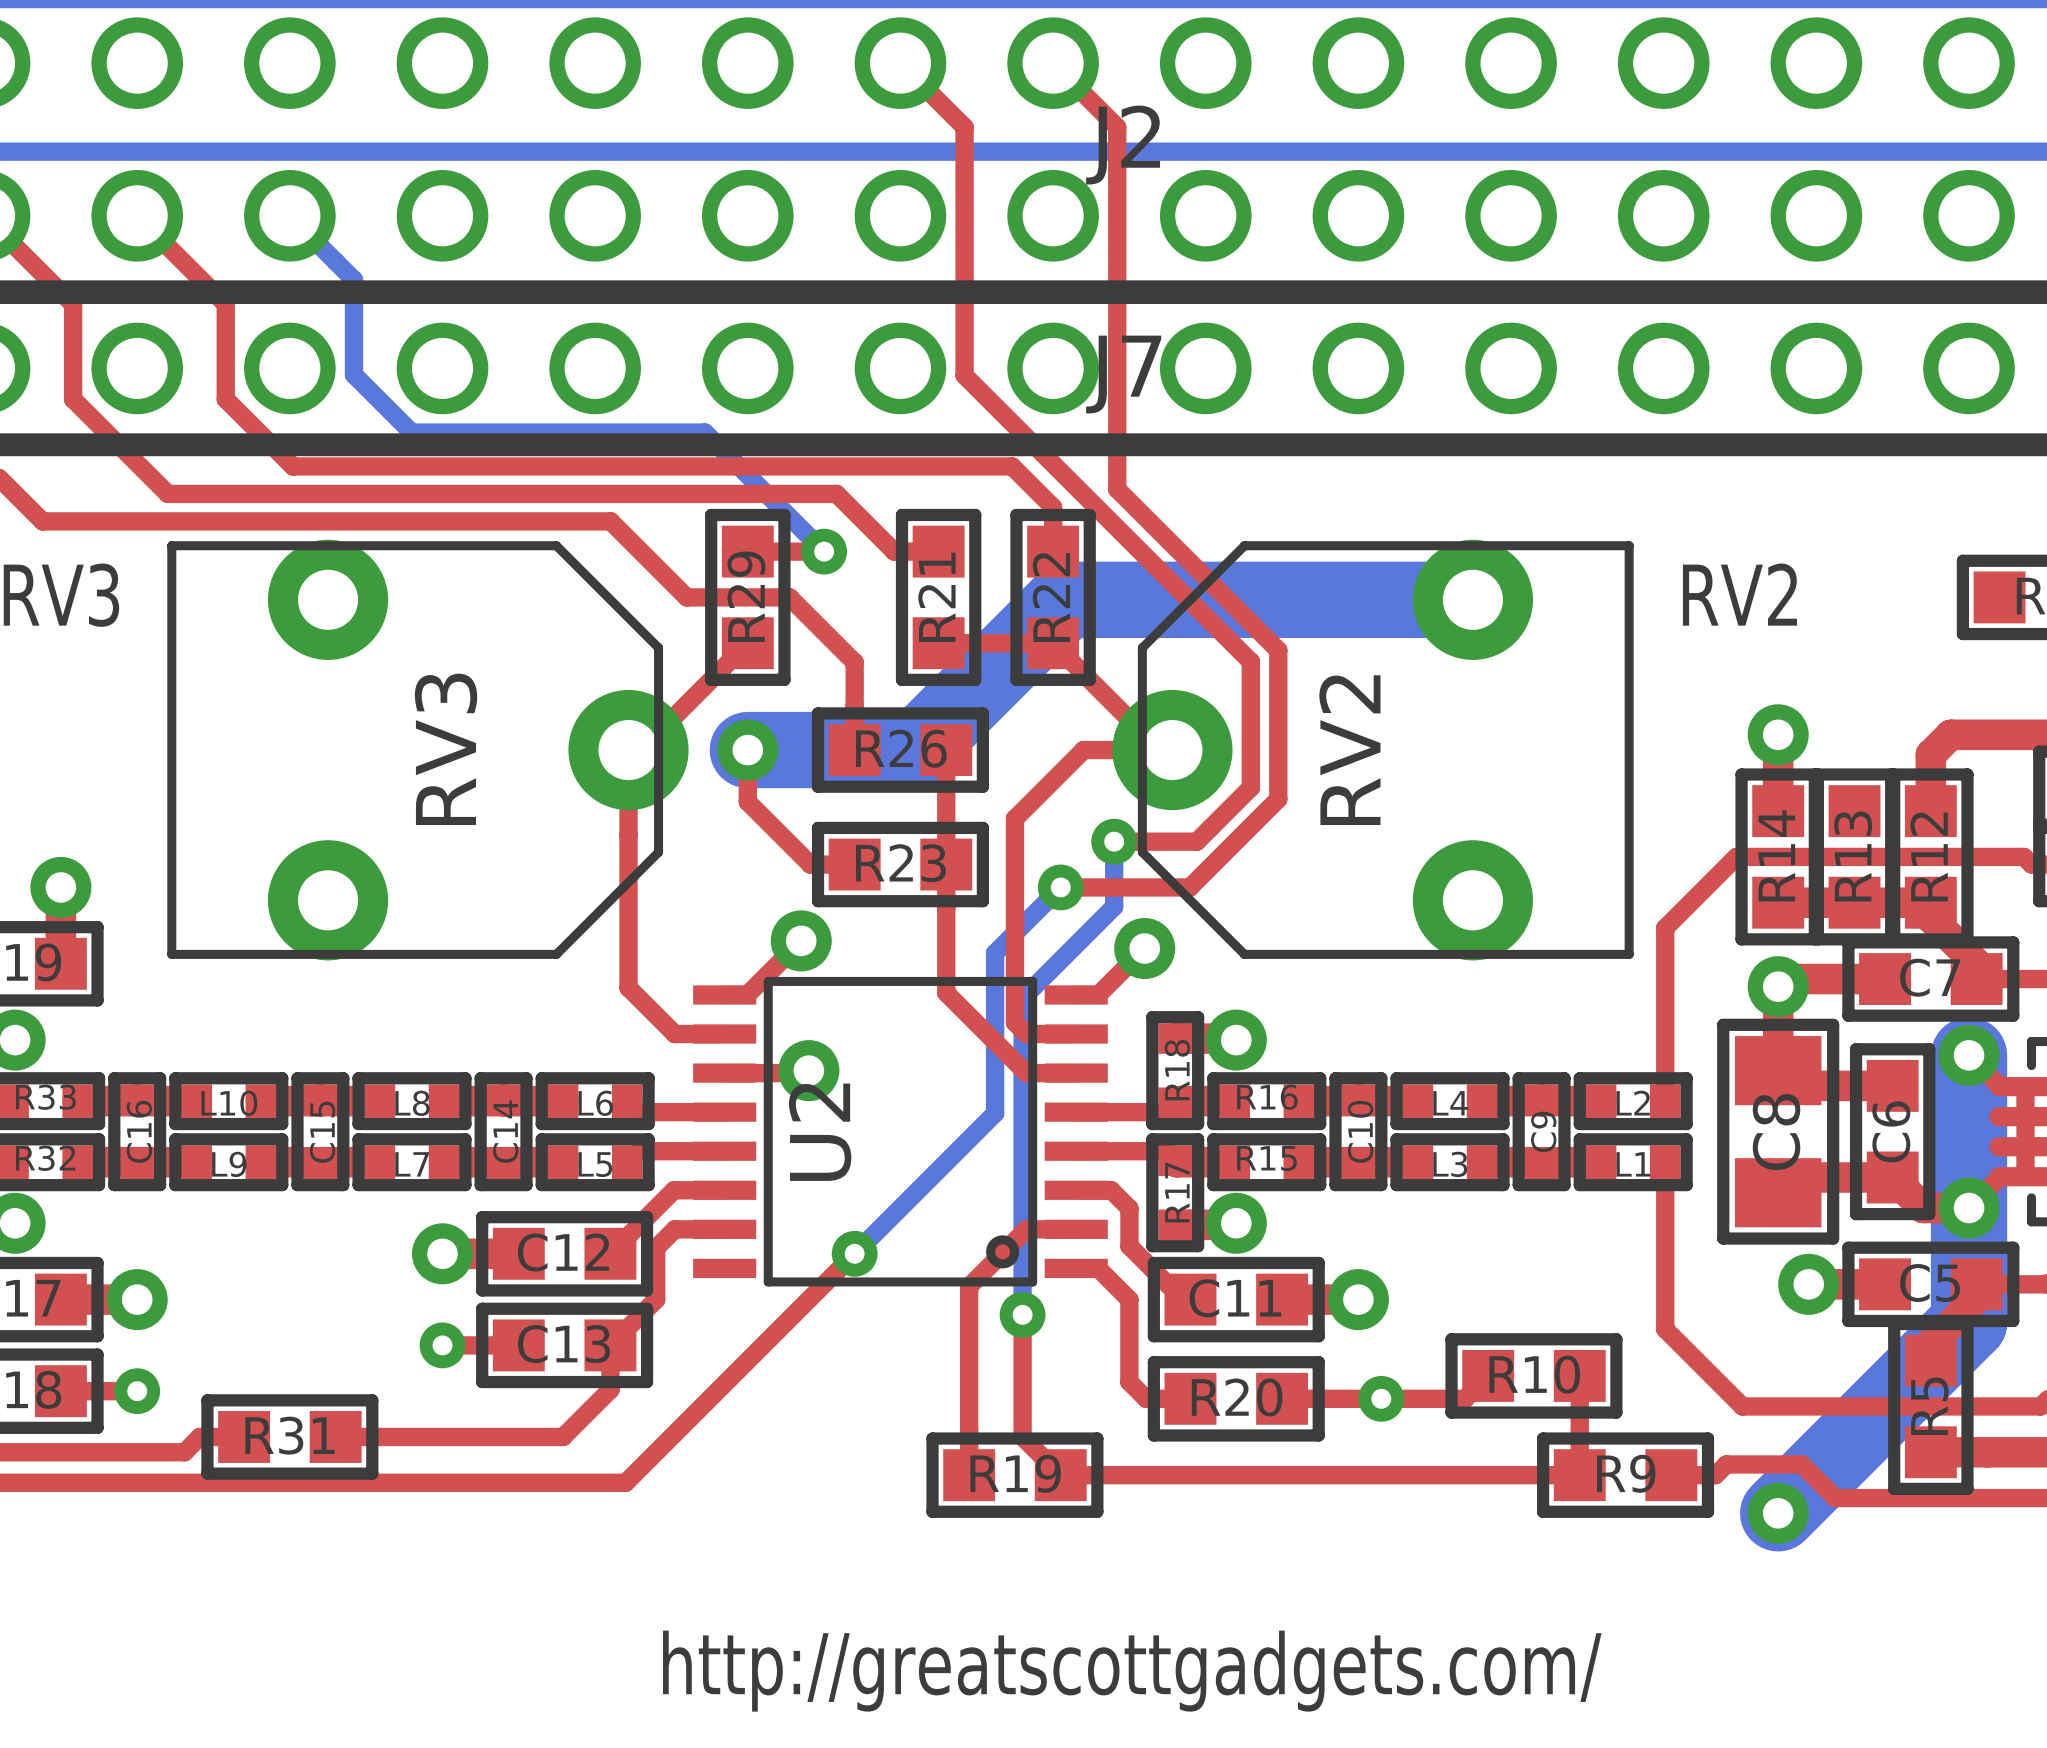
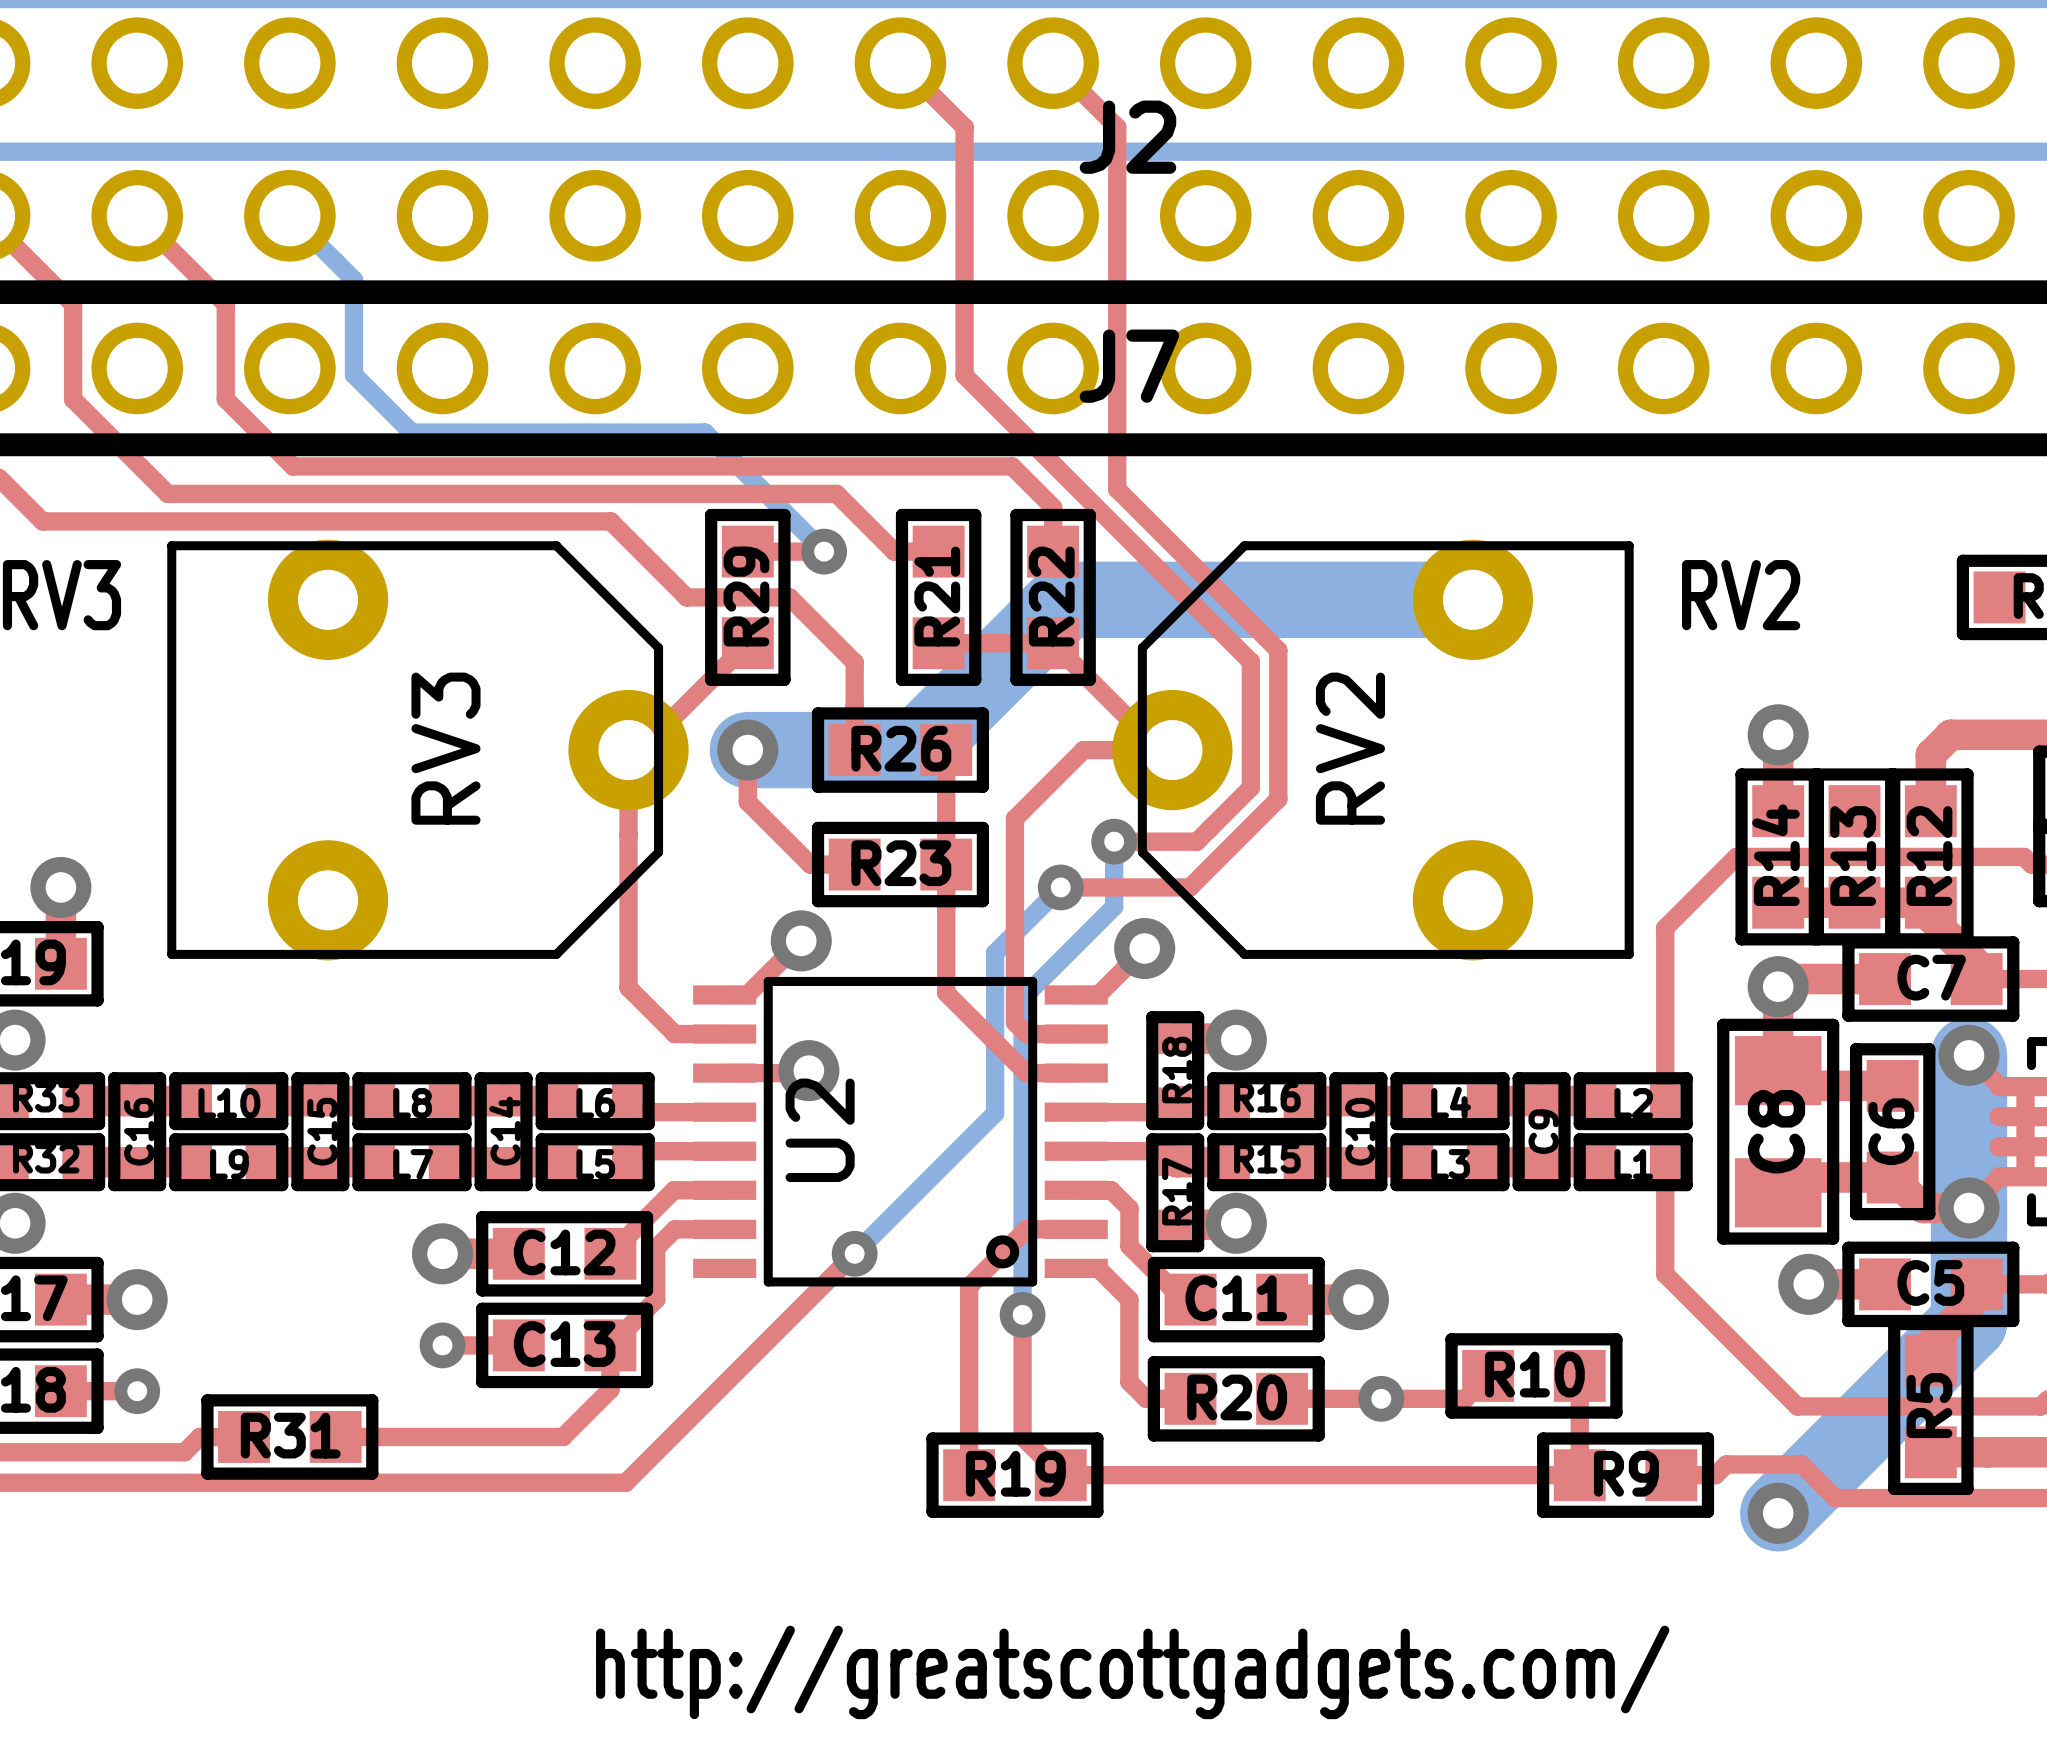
top track: (1665, 1274) (1665, 1329) (1742, 1406) (1797, 1406) -> (1665, 1274) (1797, 1406)

